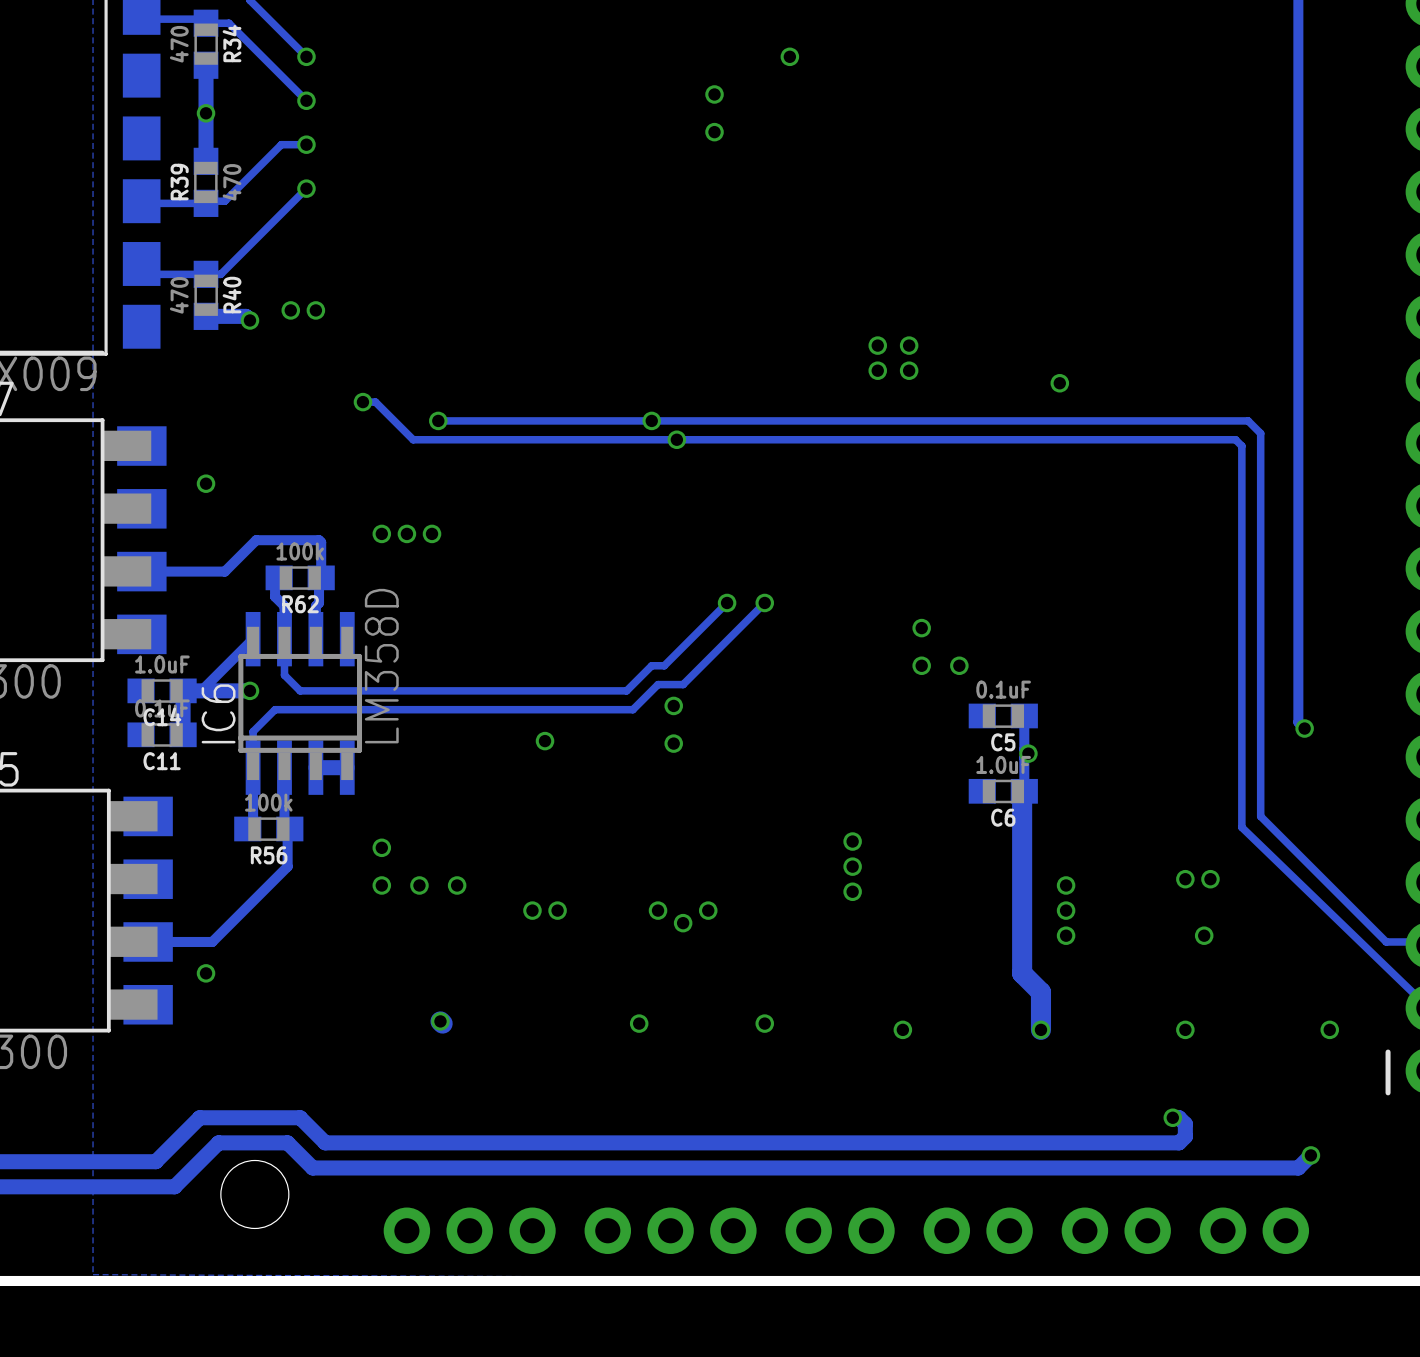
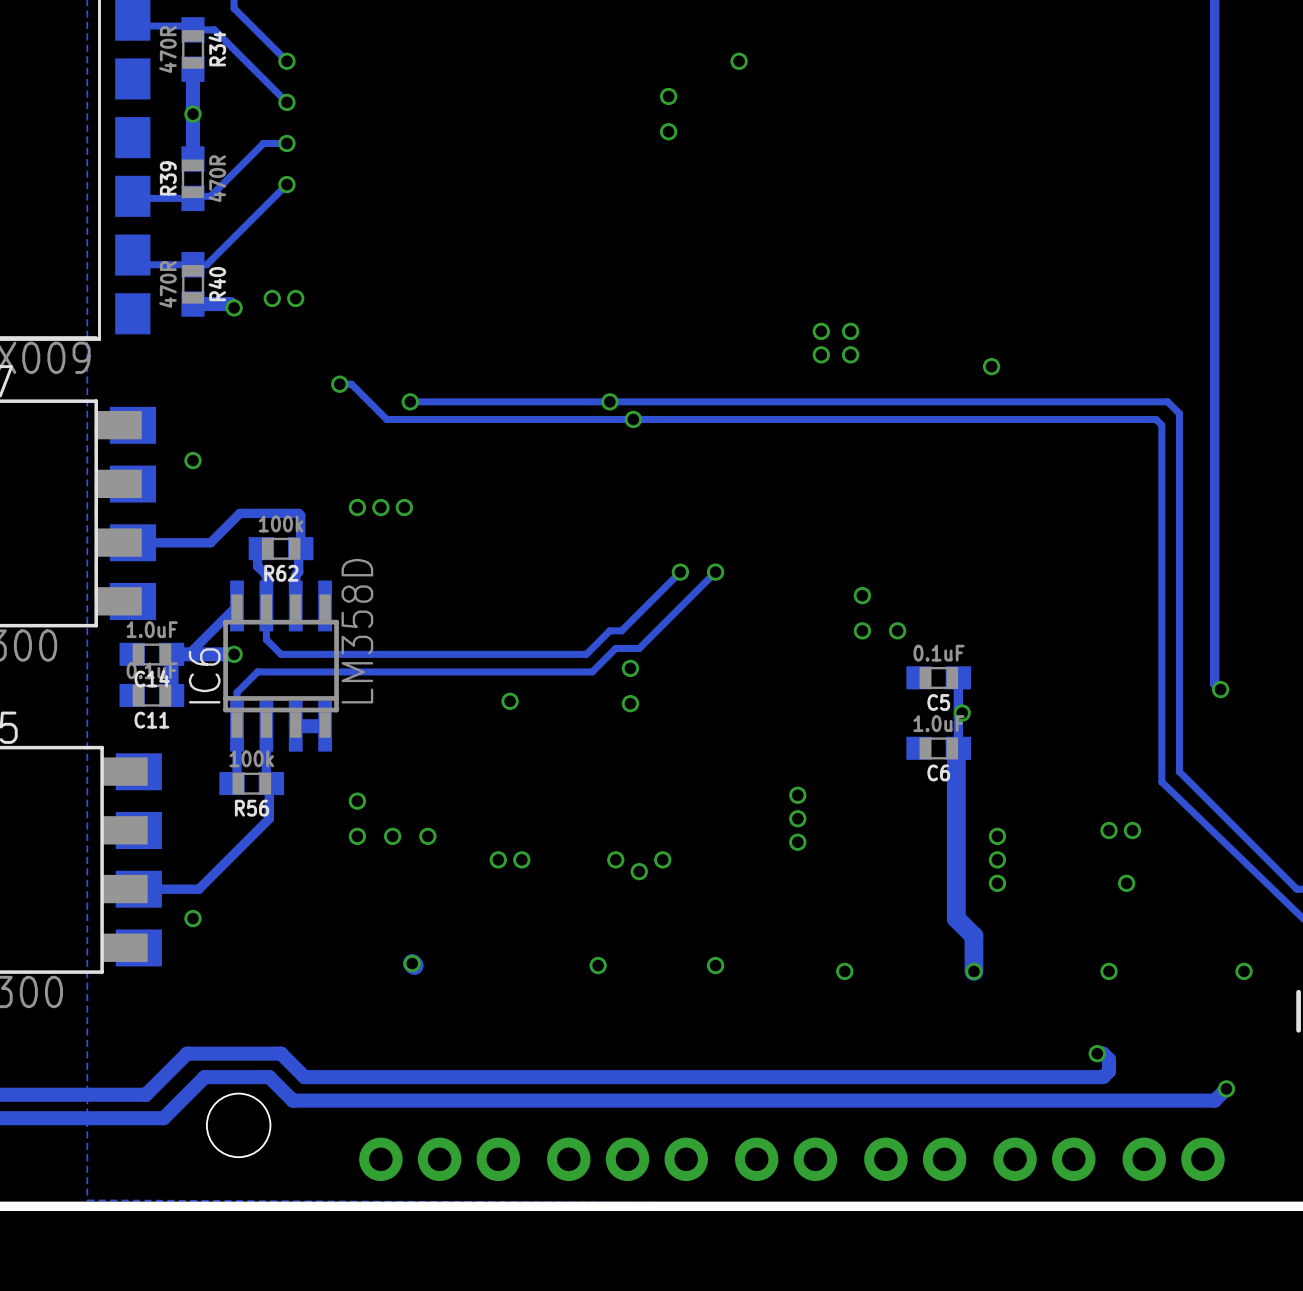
R34 value: 470 (179, 44) -> 470R (167, 49)
R39 value: 470 (232, 182) -> 470R (217, 178)
R40 value: 470 (179, 295) -> 470R (167, 284)

